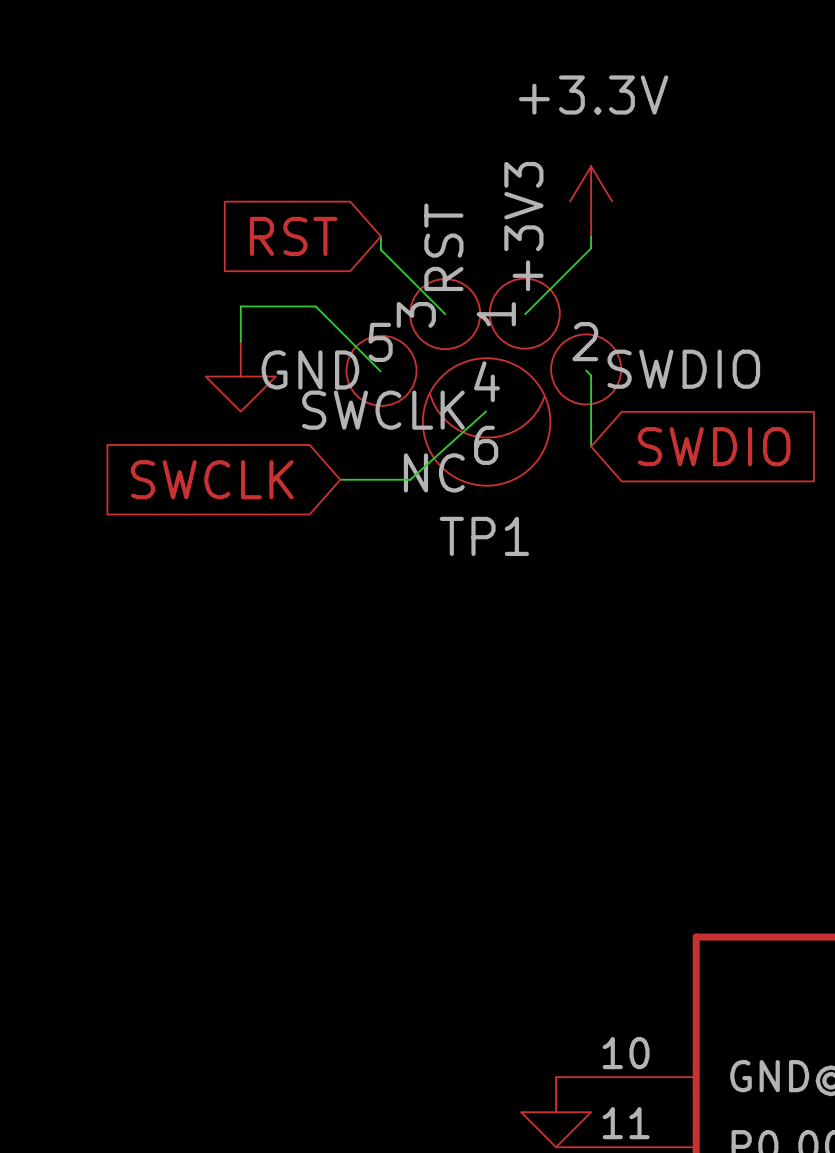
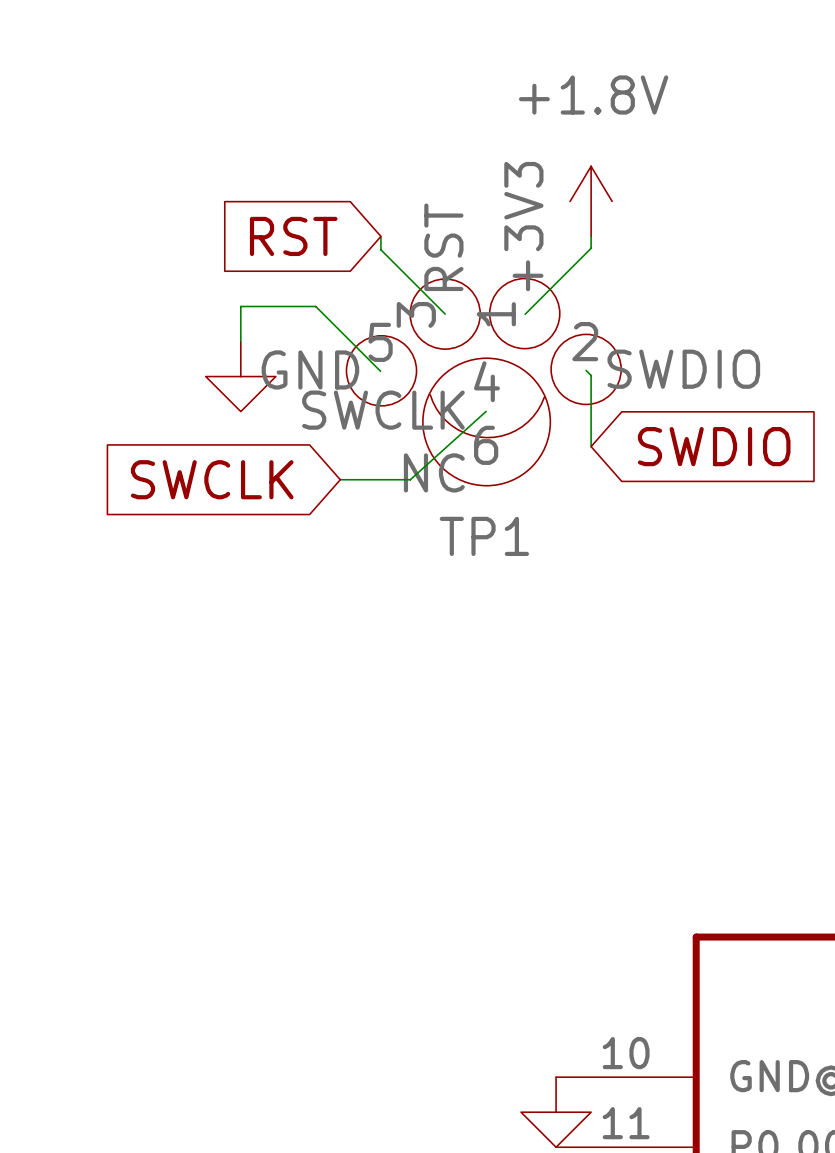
power symbol: +3.3V (591, 201) -> +1.8V (591, 201)

